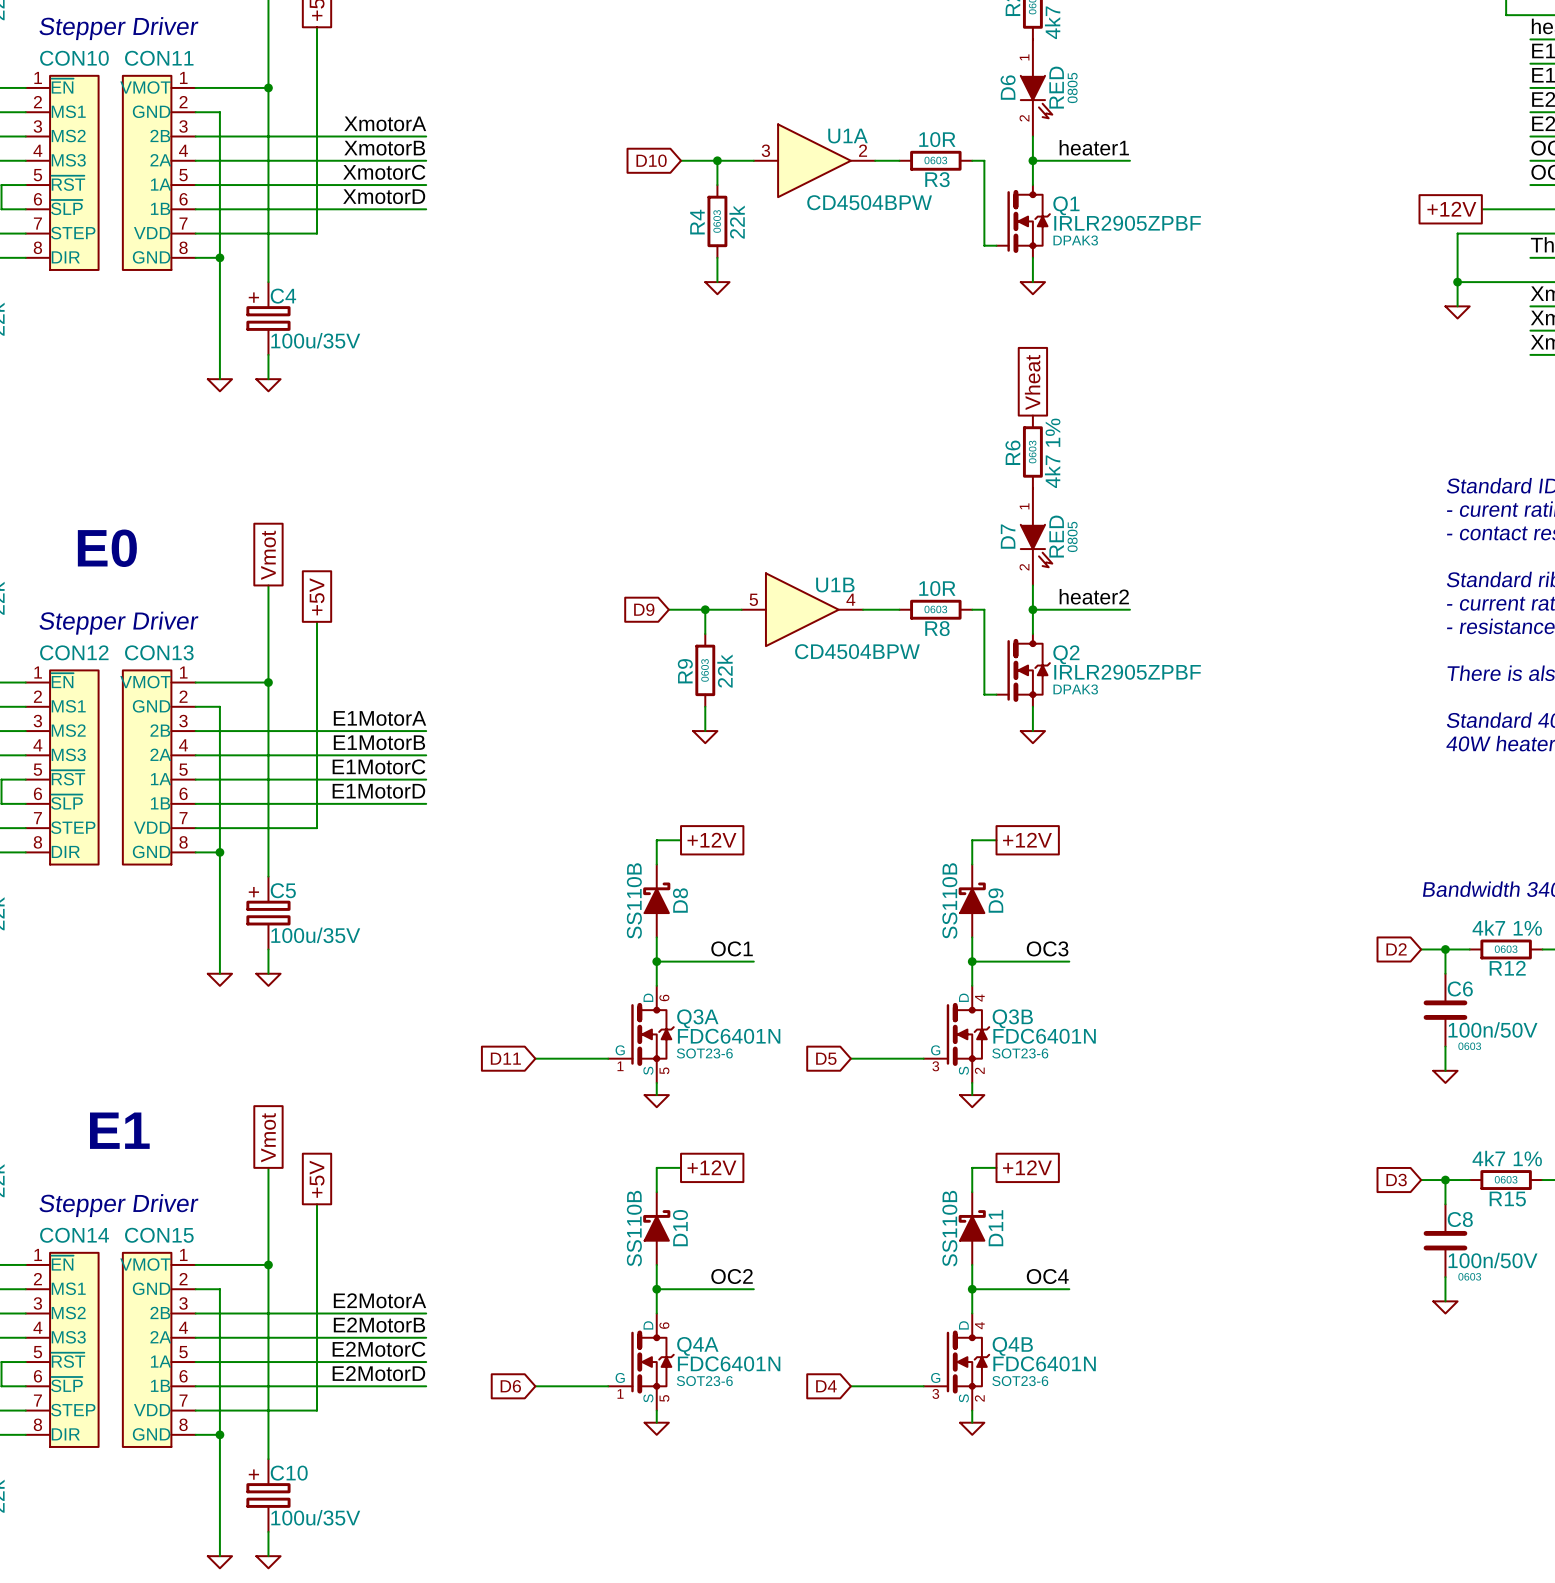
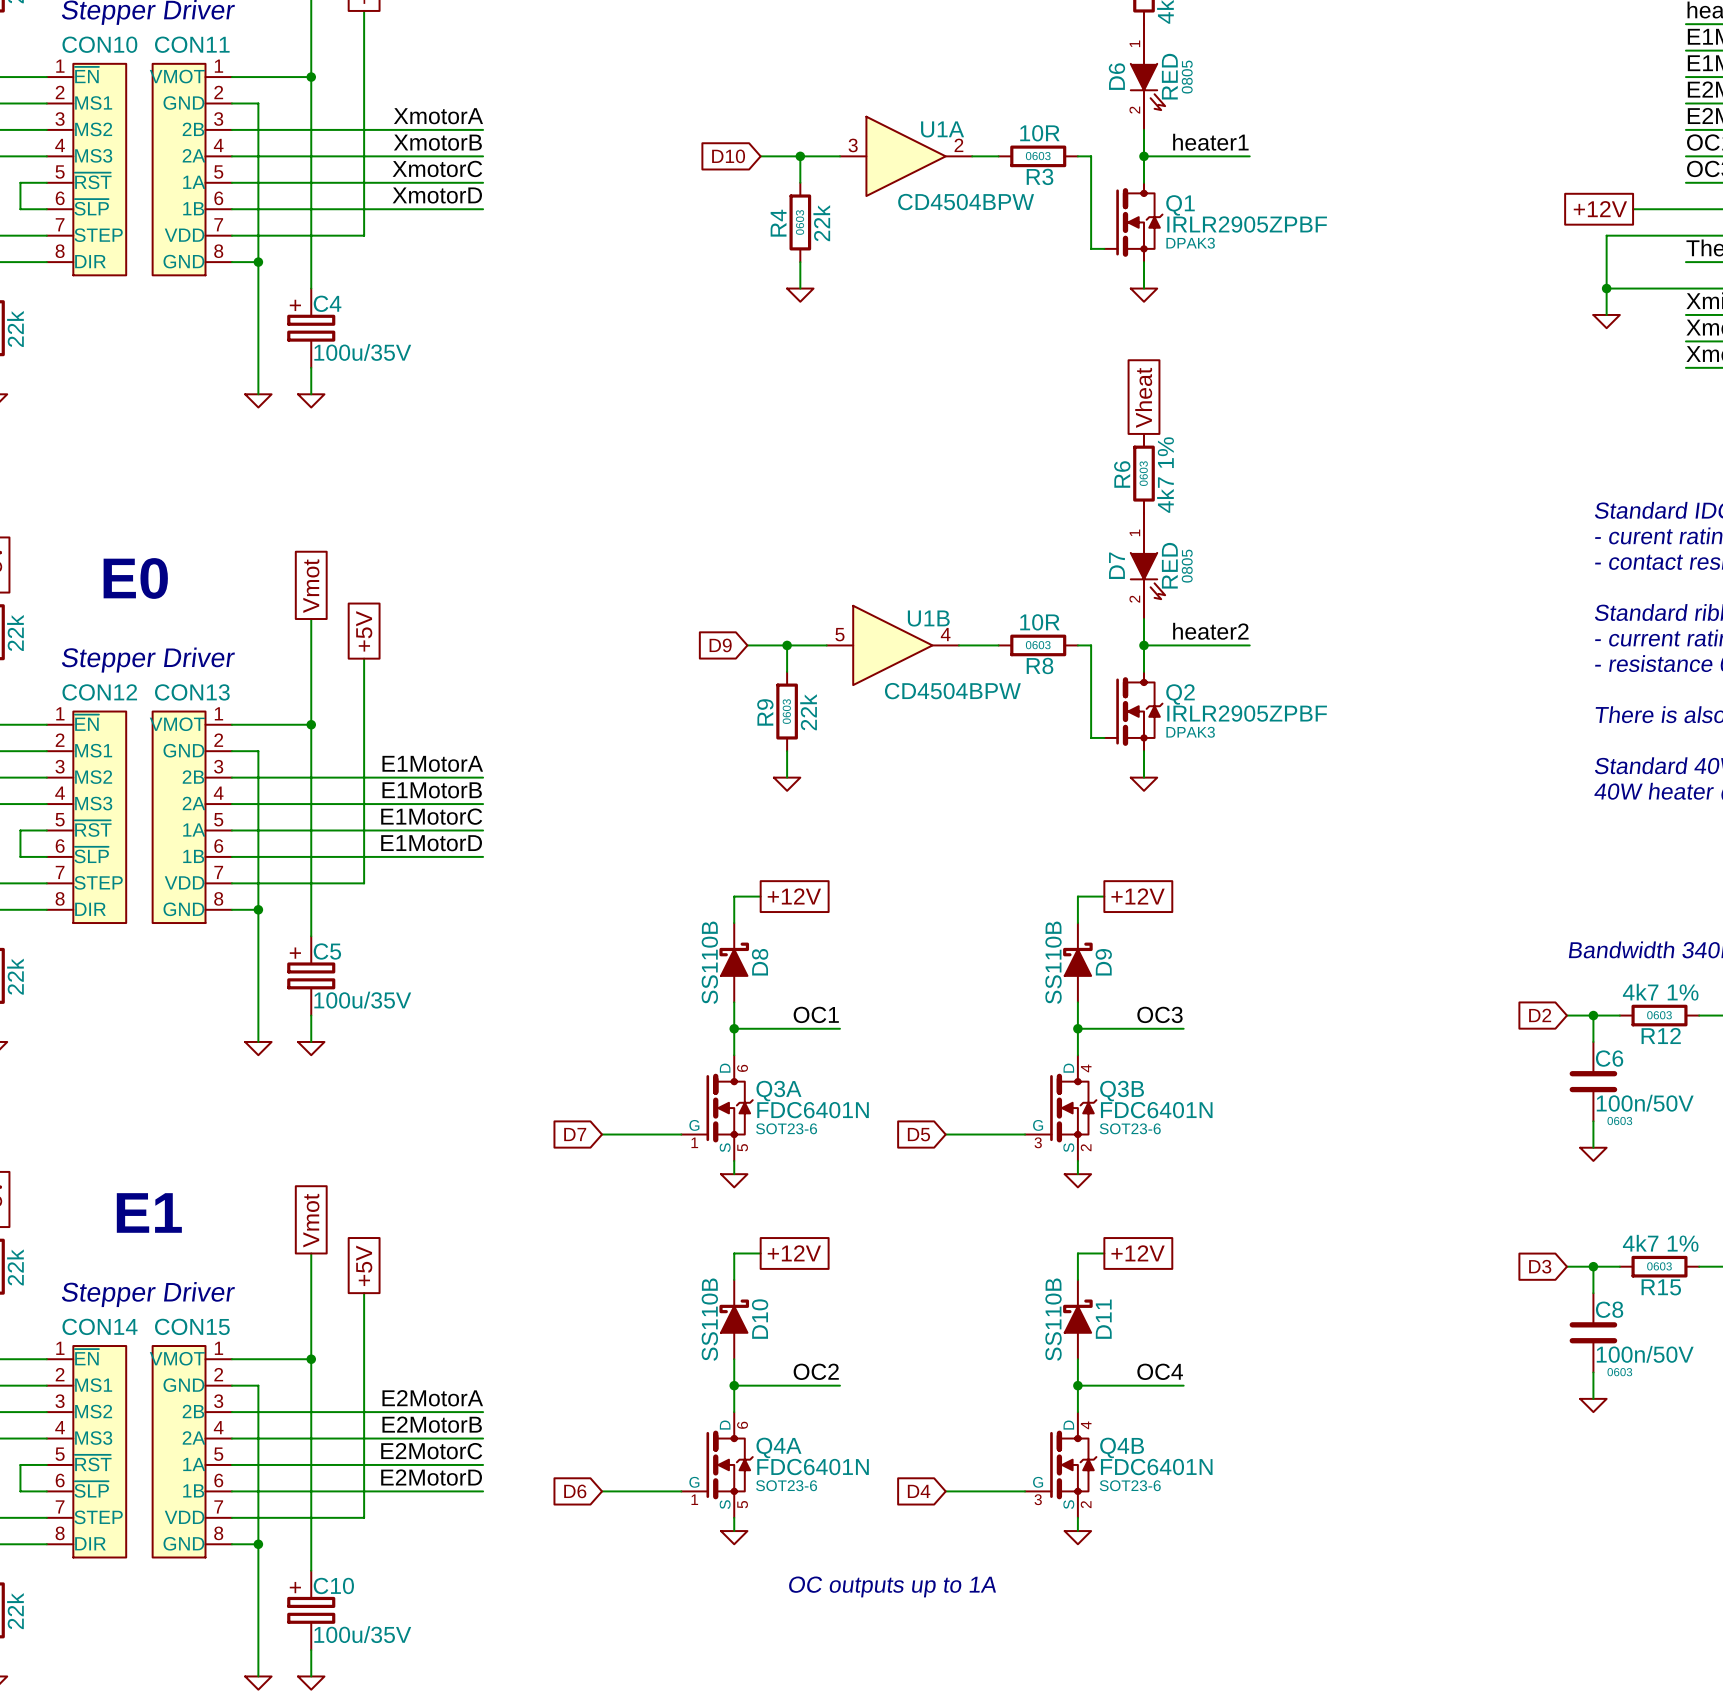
global label: D11 (505, 1058) -> D7 (575, 1134)
text: none -> OC outputs up to 1A (892, 1586)

